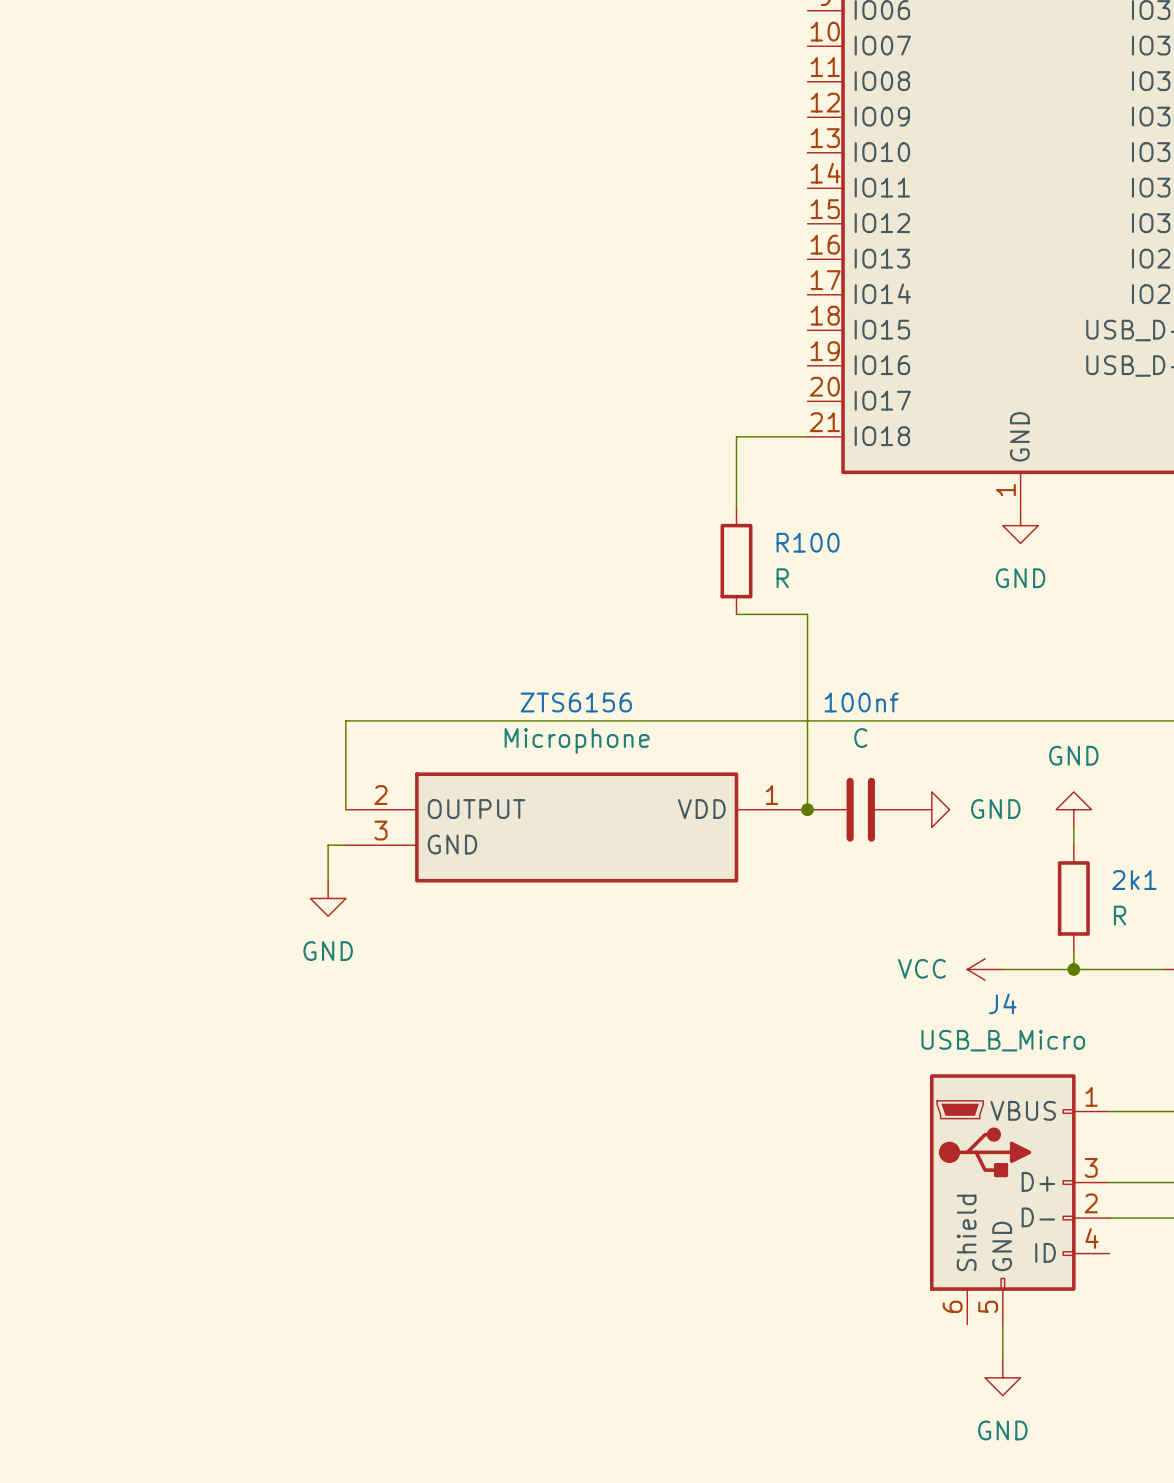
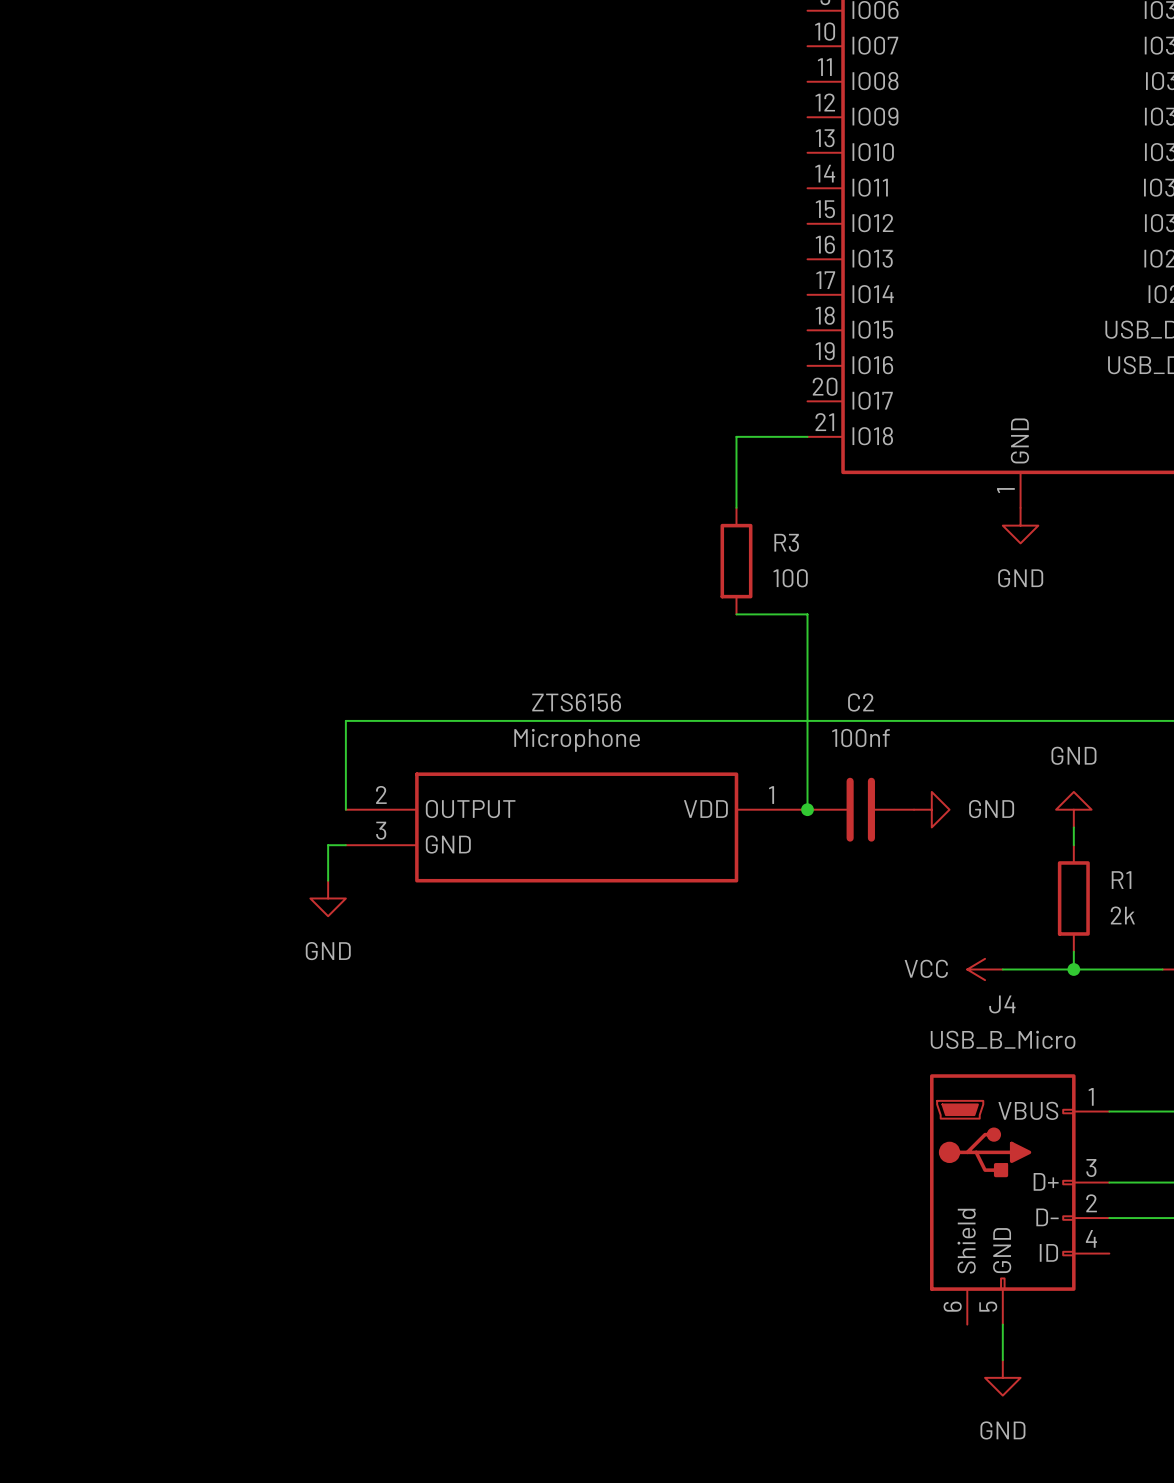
R100 name: R100 (808, 542) -> R3 (786, 542)
R100 value: R (782, 578) -> 100 (790, 578)
100nf name: 100nf (861, 702) -> C2 (860, 702)
100nf value: C (860, 738) -> 100nf (860, 738)
2k1 name: 2k1 (1134, 880) -> R1 (1121, 880)
2k1 value: R (1120, 915) -> 2k (1122, 915)

